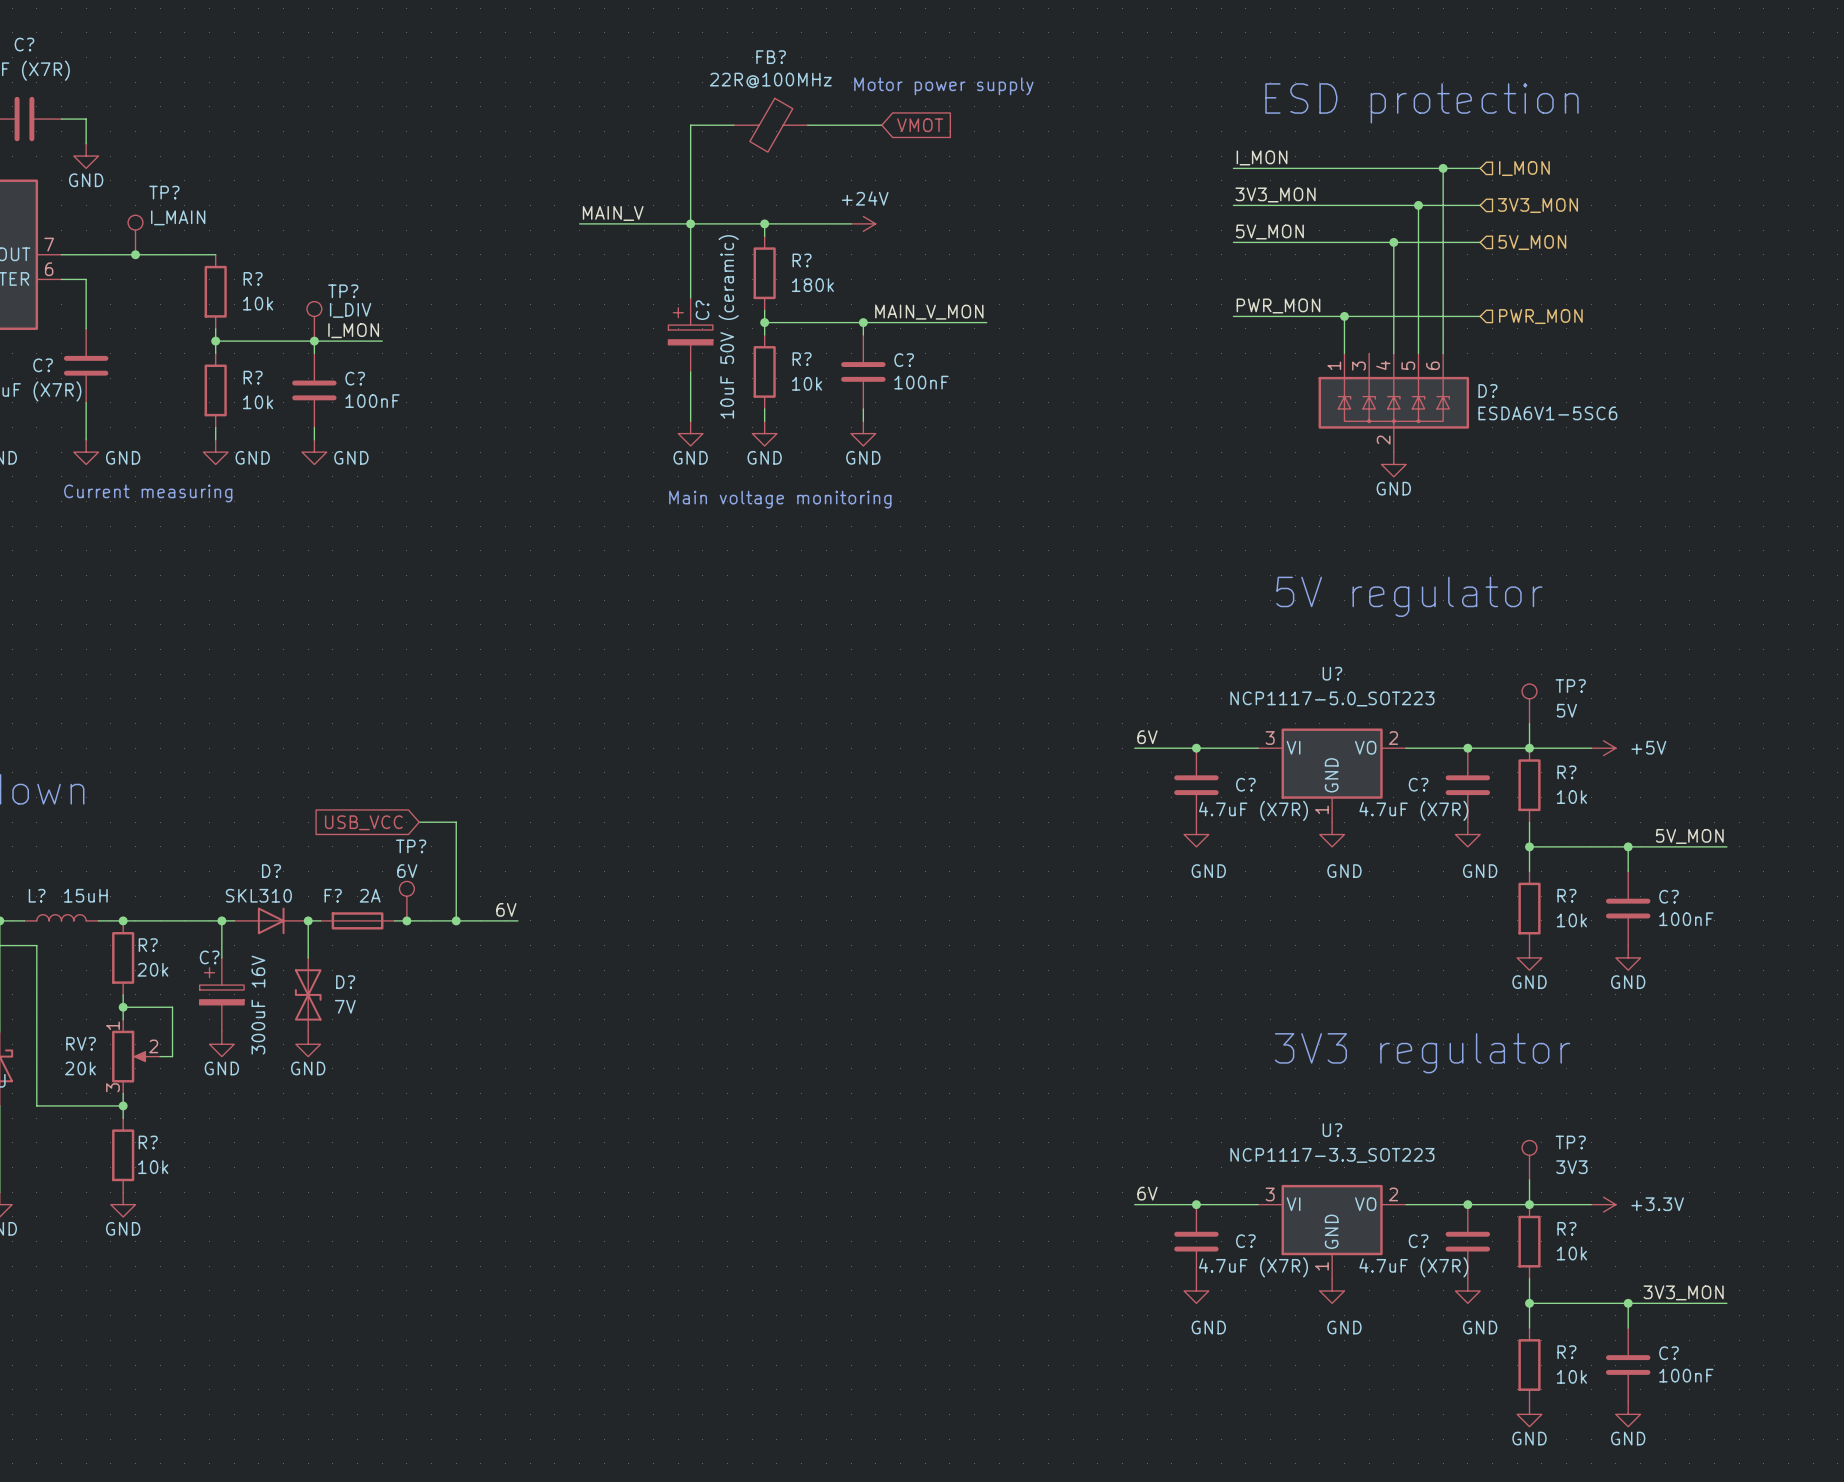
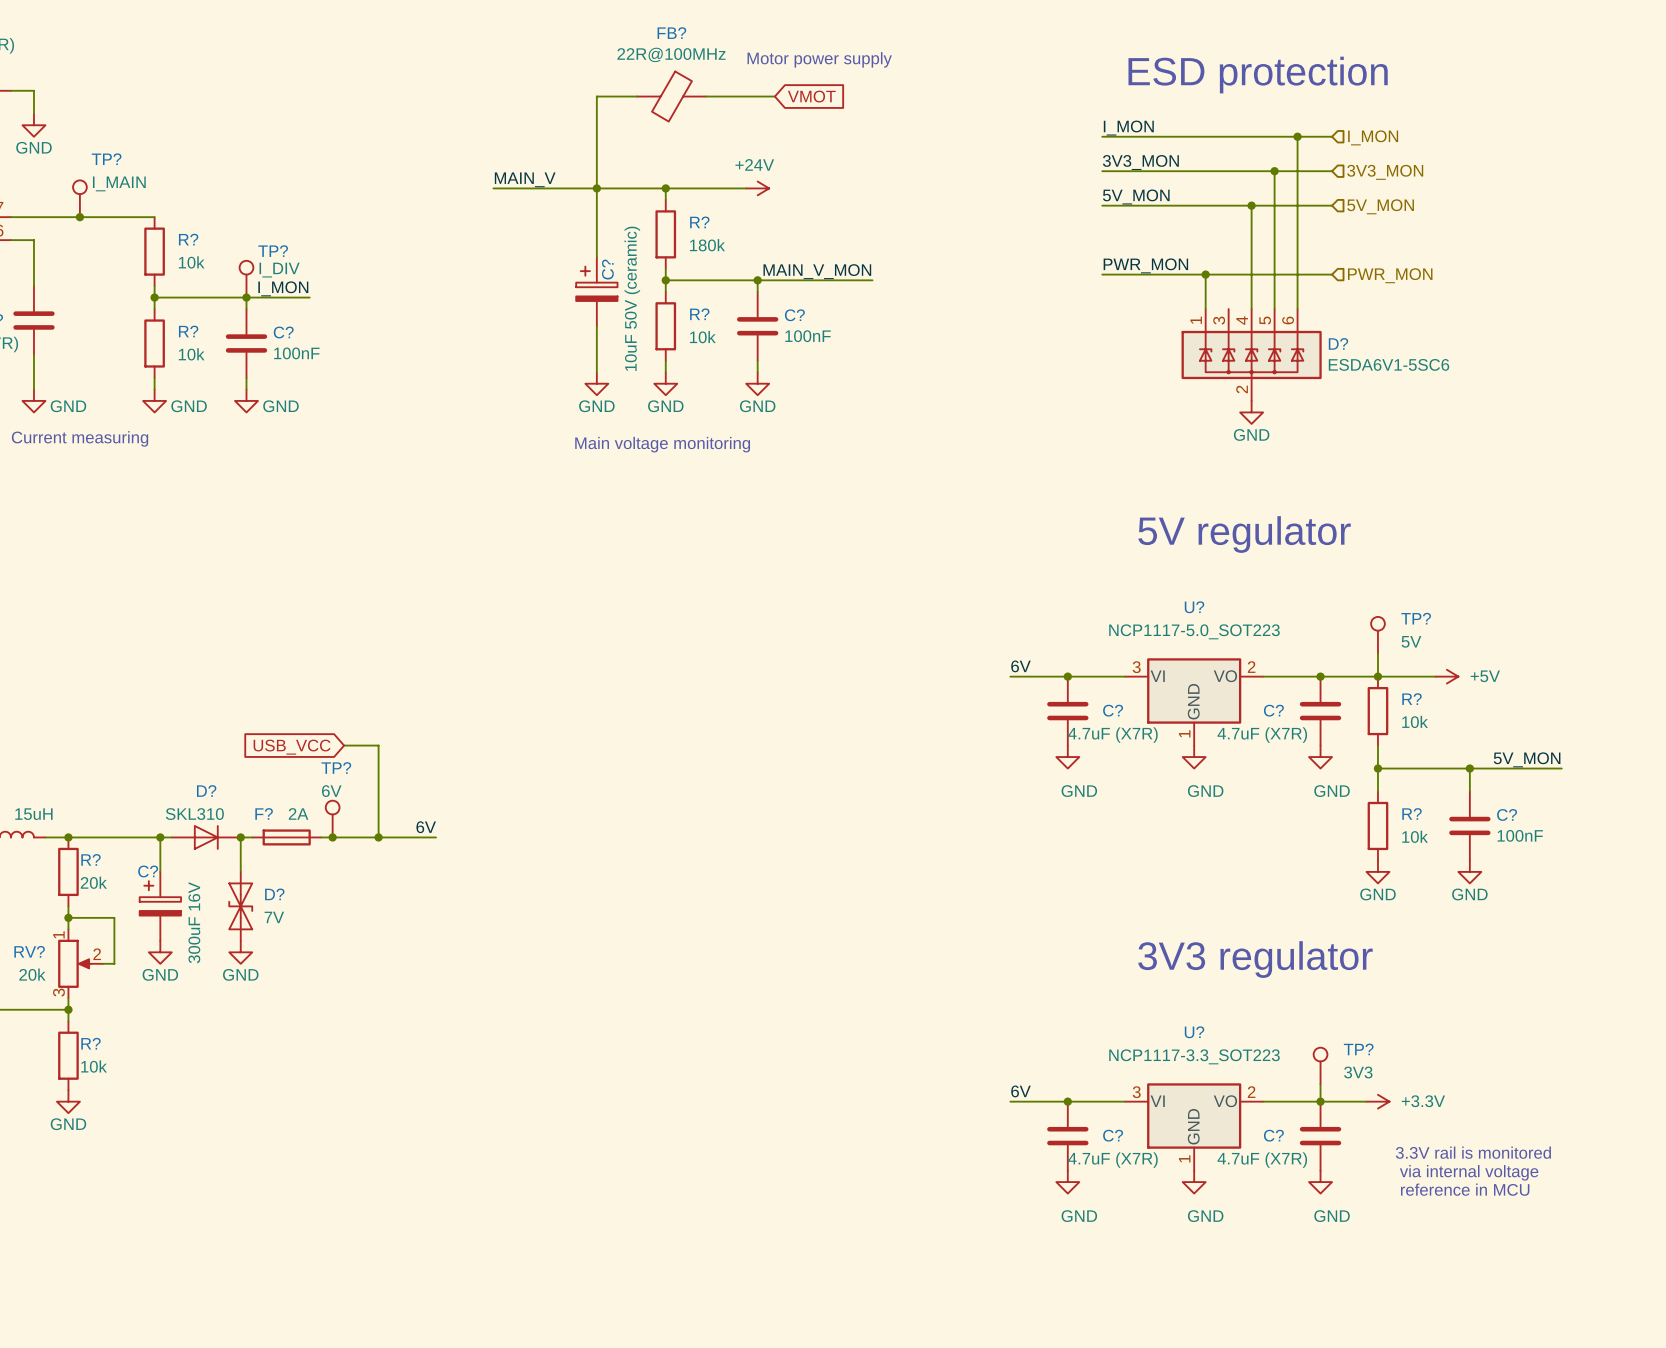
TP? position: (1529, 1160) -> (1320, 1066)
wire: (1529, 1179) (1529, 1204) -> none
wire: none -> (1320, 1084) (1320, 1101)
wire: (1517, 1204) (1591, 1204) -> none
junction: (1529, 1204) -> none
power symbol position: +3.3V (1603, 1204) -> +3.3V (1377, 1101)
R?: 10k (1529, 1241) -> none
text: none -> 3.3V rail is monitored (1473, 1152)
wire: (1529, 1278) (1529, 1328) -> none
text: none -> via internal voltage (1469, 1172)
label: 3V3_MON (1683, 1292) -> none
text: none -> reference in MCU (1465, 1189)
wire: (1529, 1303) (1726, 1303) -> none
junction: (1529, 1303) -> none
wire: (1628, 1303) (1628, 1328) -> none
junction: (1628, 1303) -> none
R?: 10k (1529, 1365) -> none
C?: 100nF (1628, 1365) -> none
power symbol: GND (1529, 1414) -> none
power symbol: GND (1628, 1414) -> none

